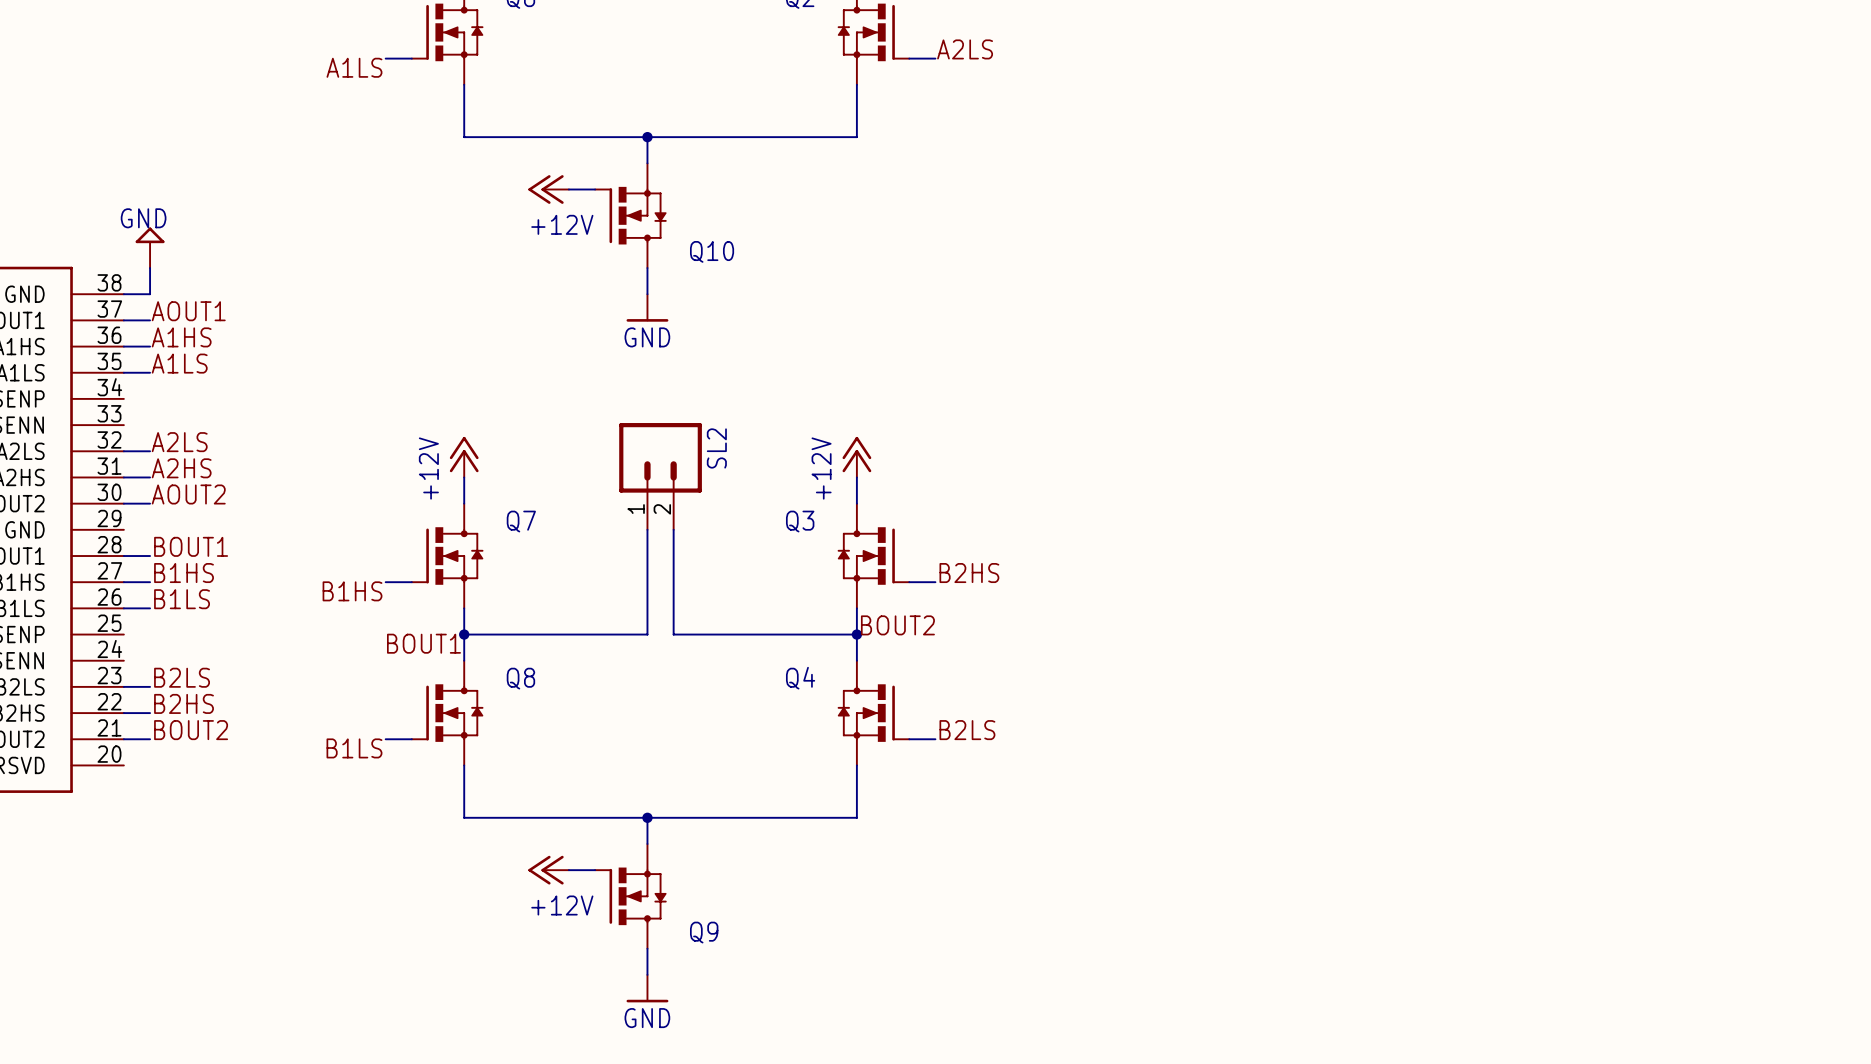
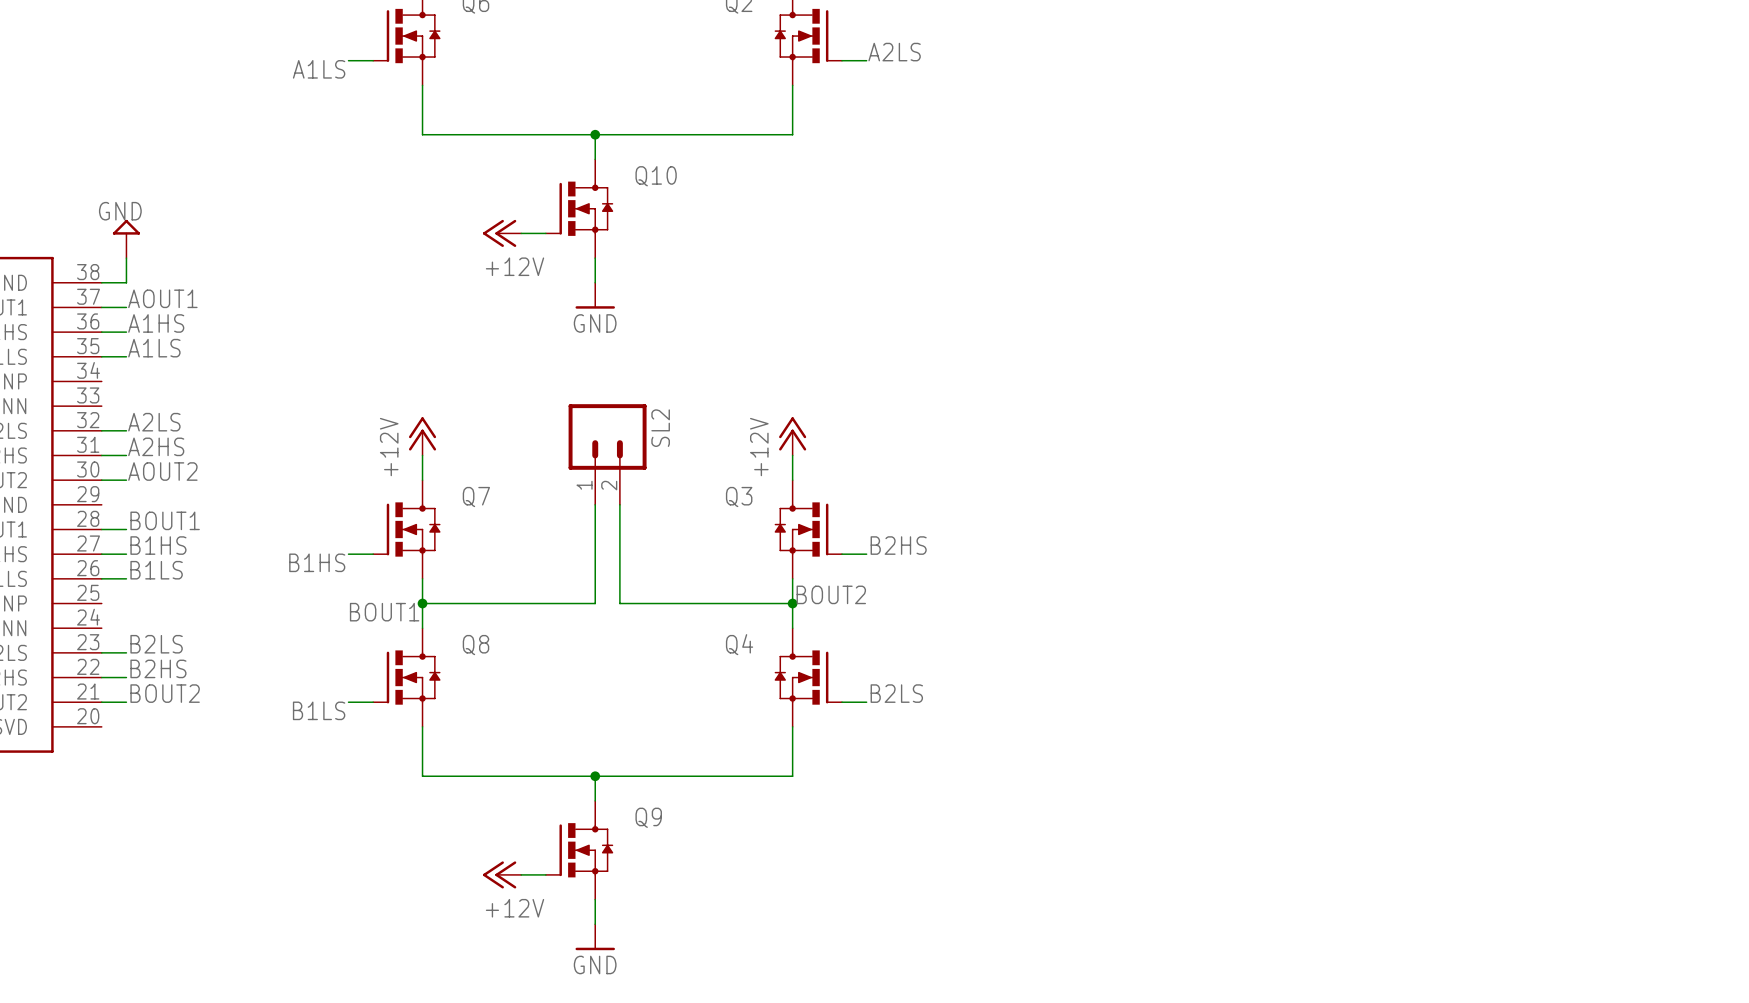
power symbol position: +12V (548, 189) -> +12V (502, 233)
wire: (568, 189) (595, 189) -> (521, 233) (545, 233)
Q10 flip: as is (630, 215) -> up-down (579, 208)
power symbol position: +12V (548, 870) -> +12V (502, 874)
wire: (568, 870) (595, 870) -> (521, 874) (545, 874)
Q9 flip: as is (630, 896) -> up-down (579, 850)

